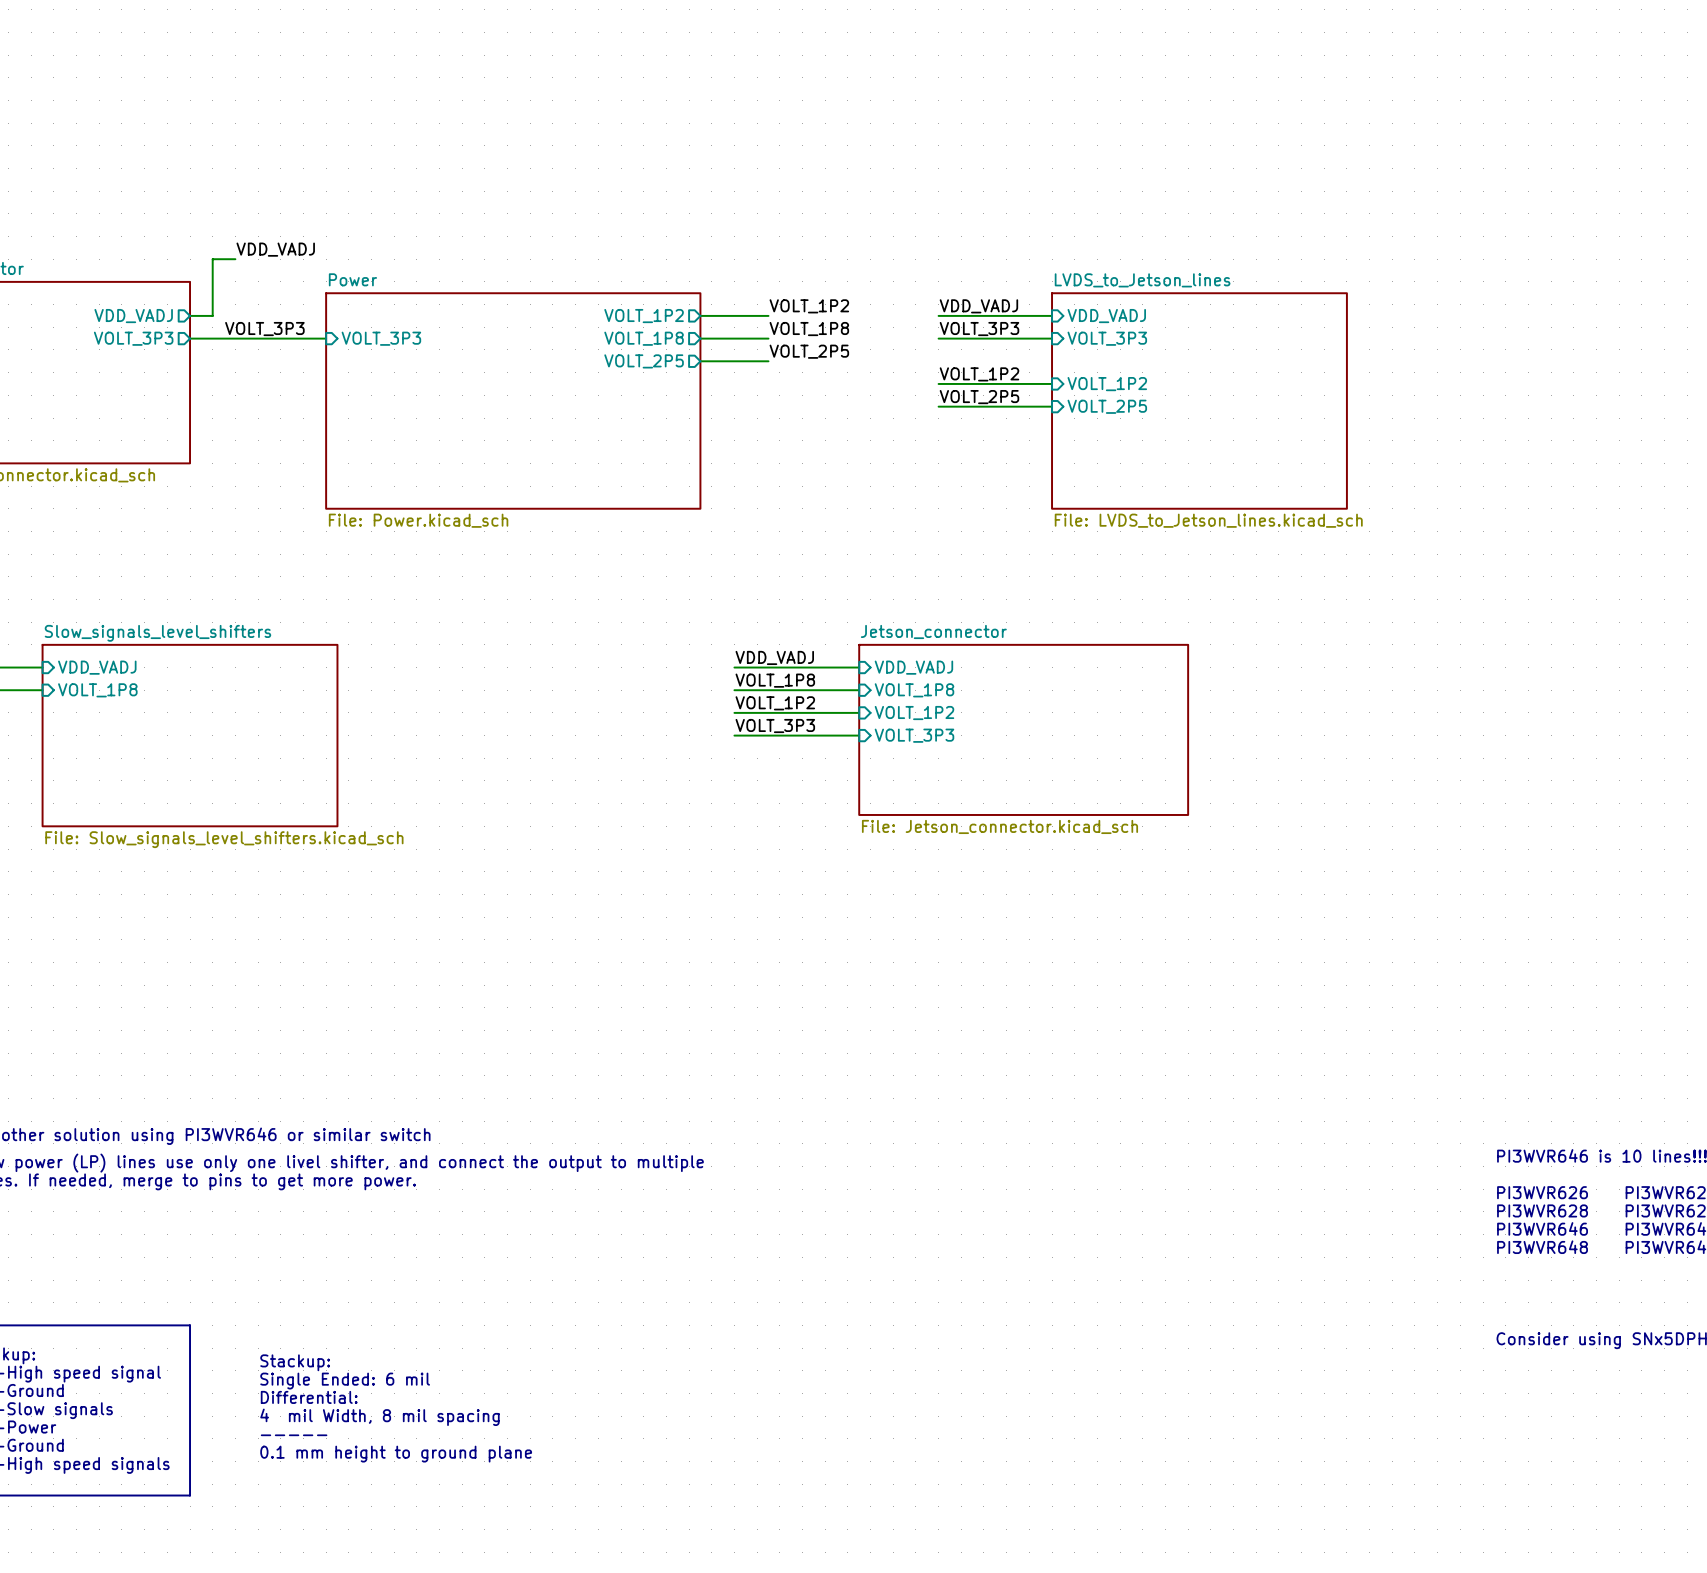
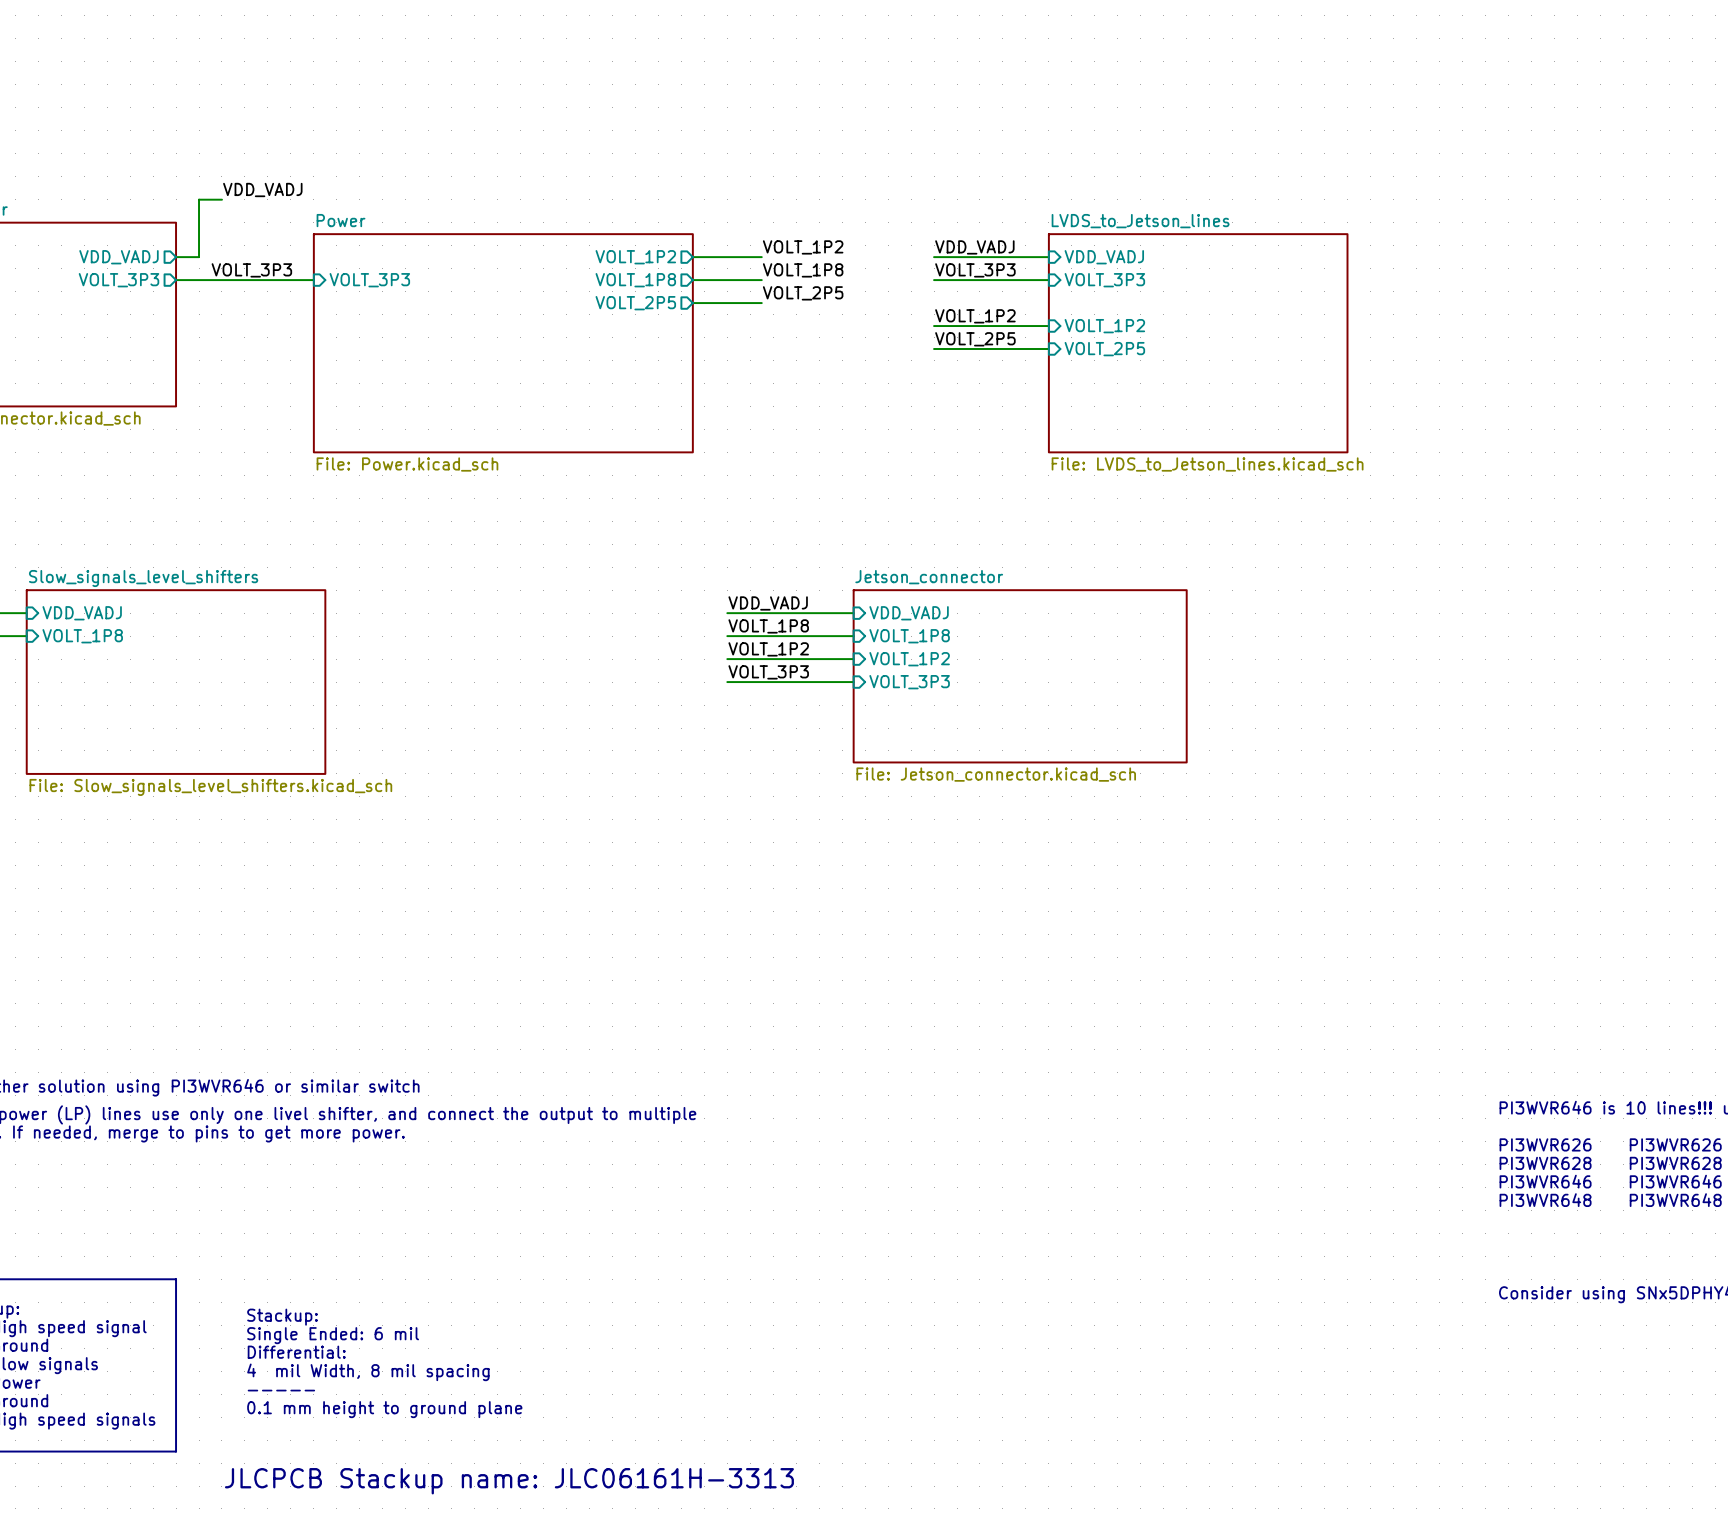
text: none -> JLCPCB Stackup name: JLC06161H-3313 (509, 1481)

